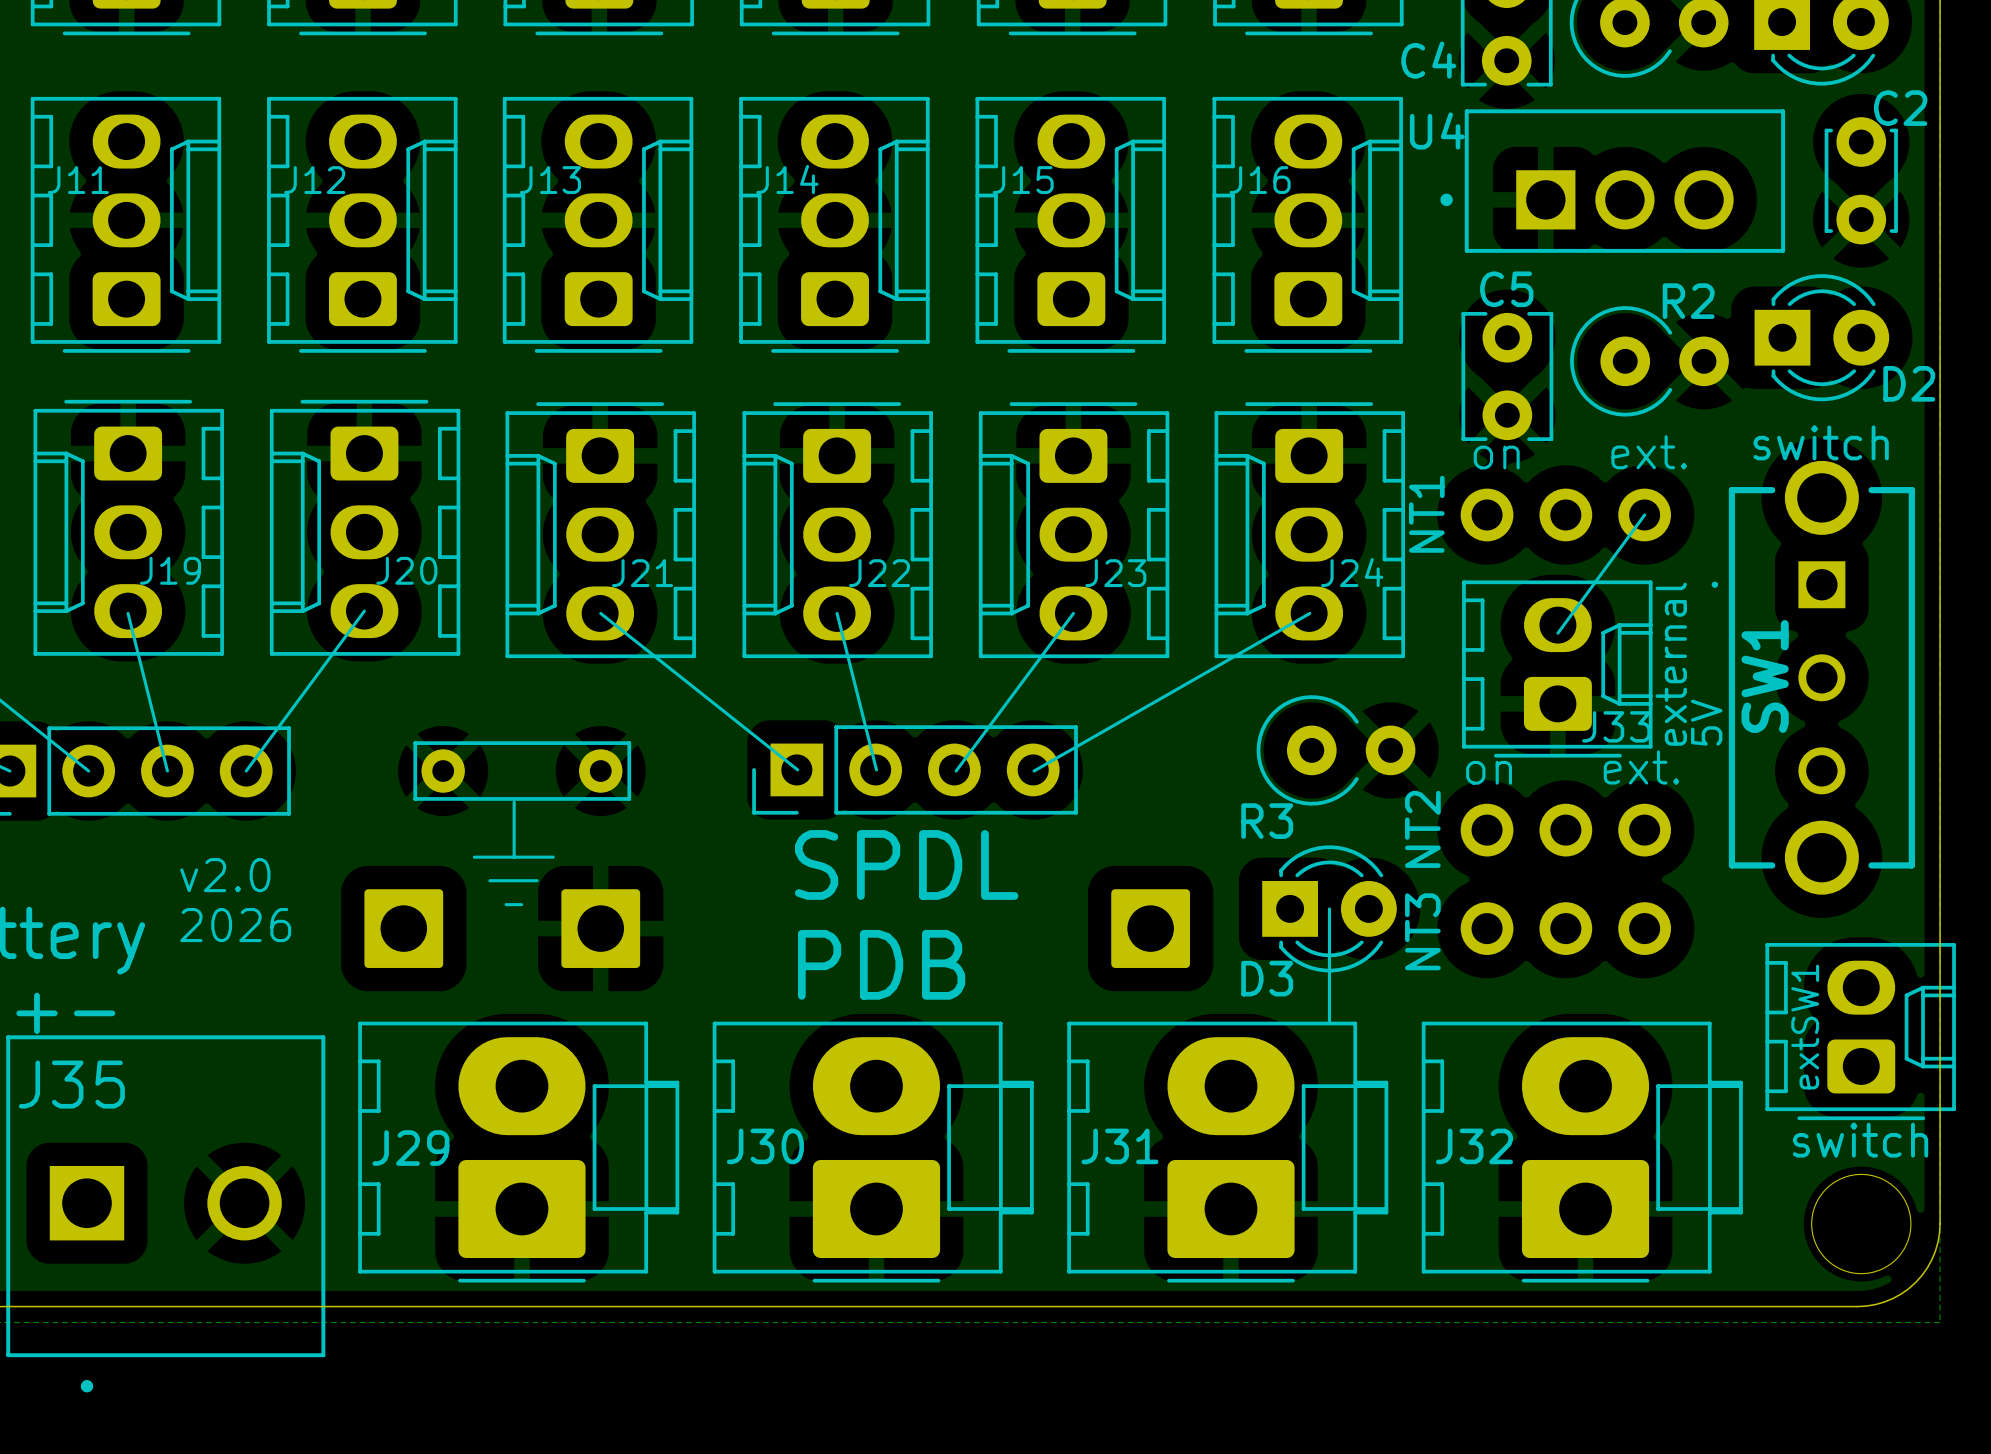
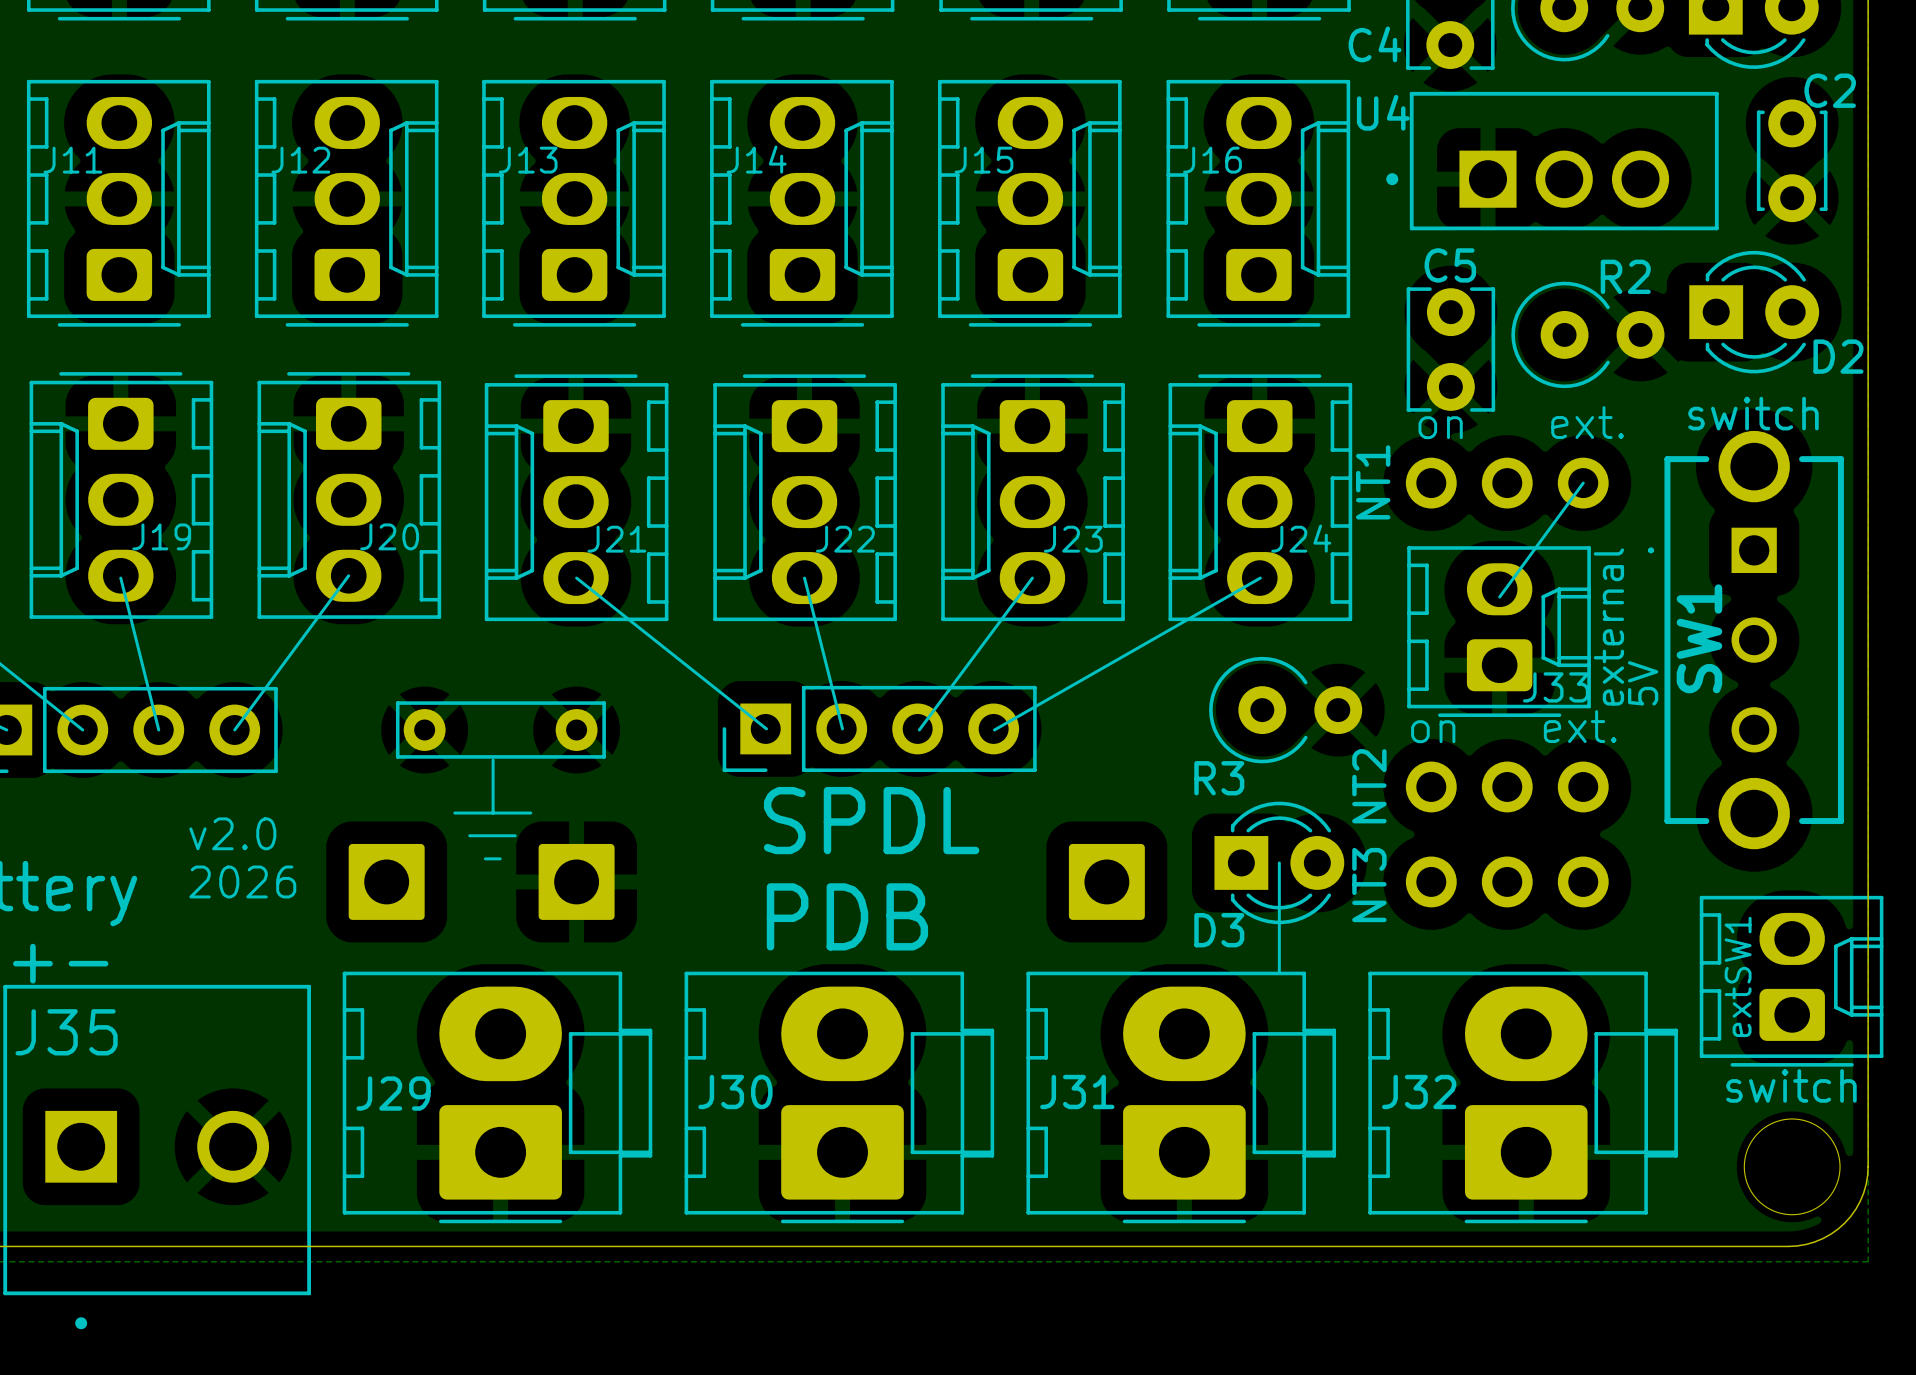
text position: v2.0 (225, 875) -> v2.0 (232, 833)
text position: 2026 (235, 925) -> 2026 (242, 881)

